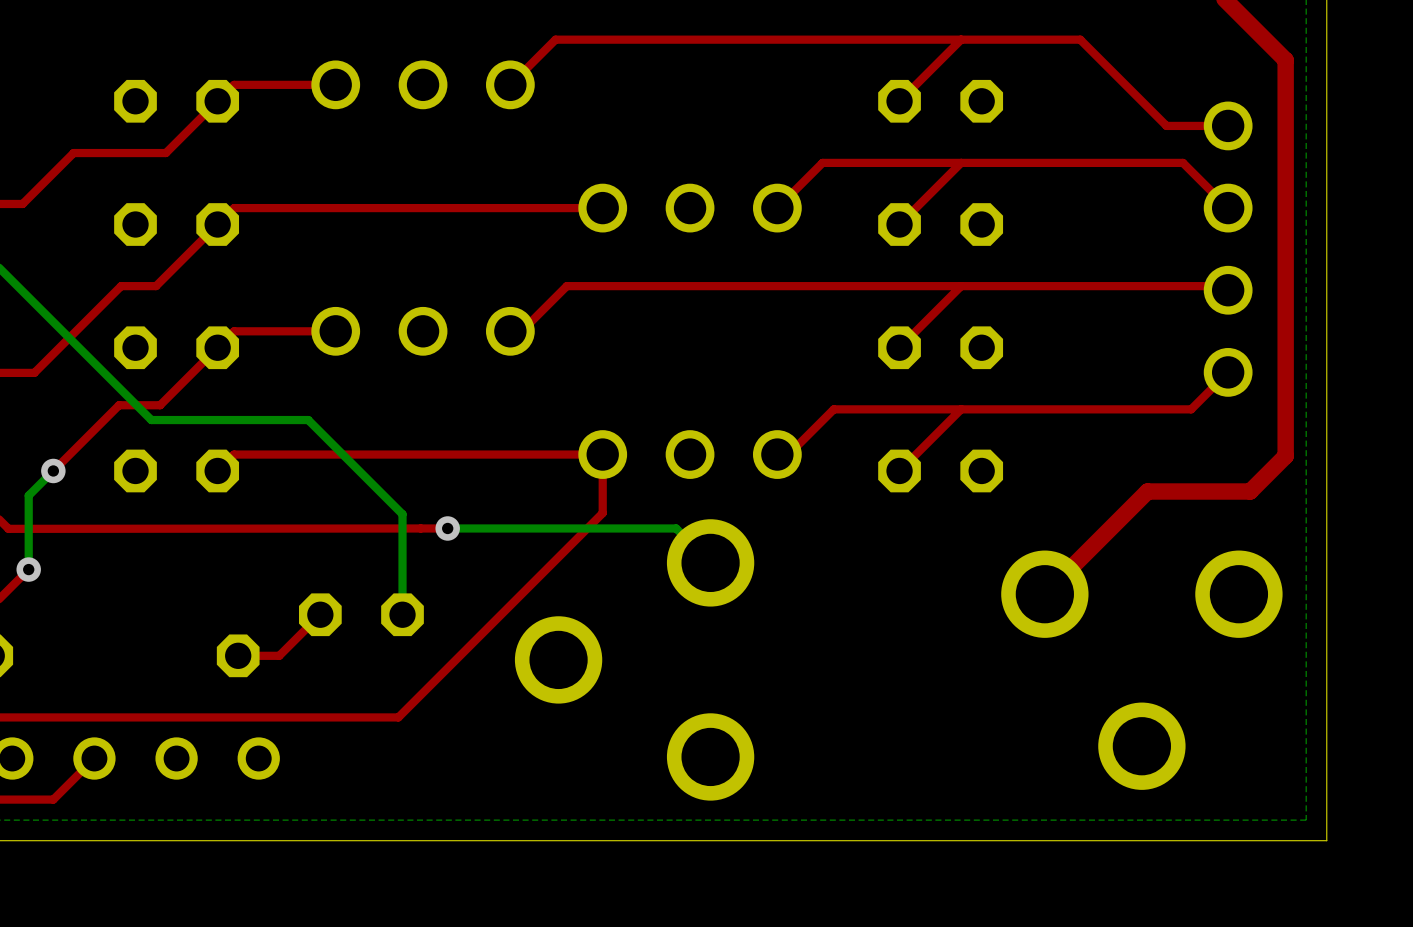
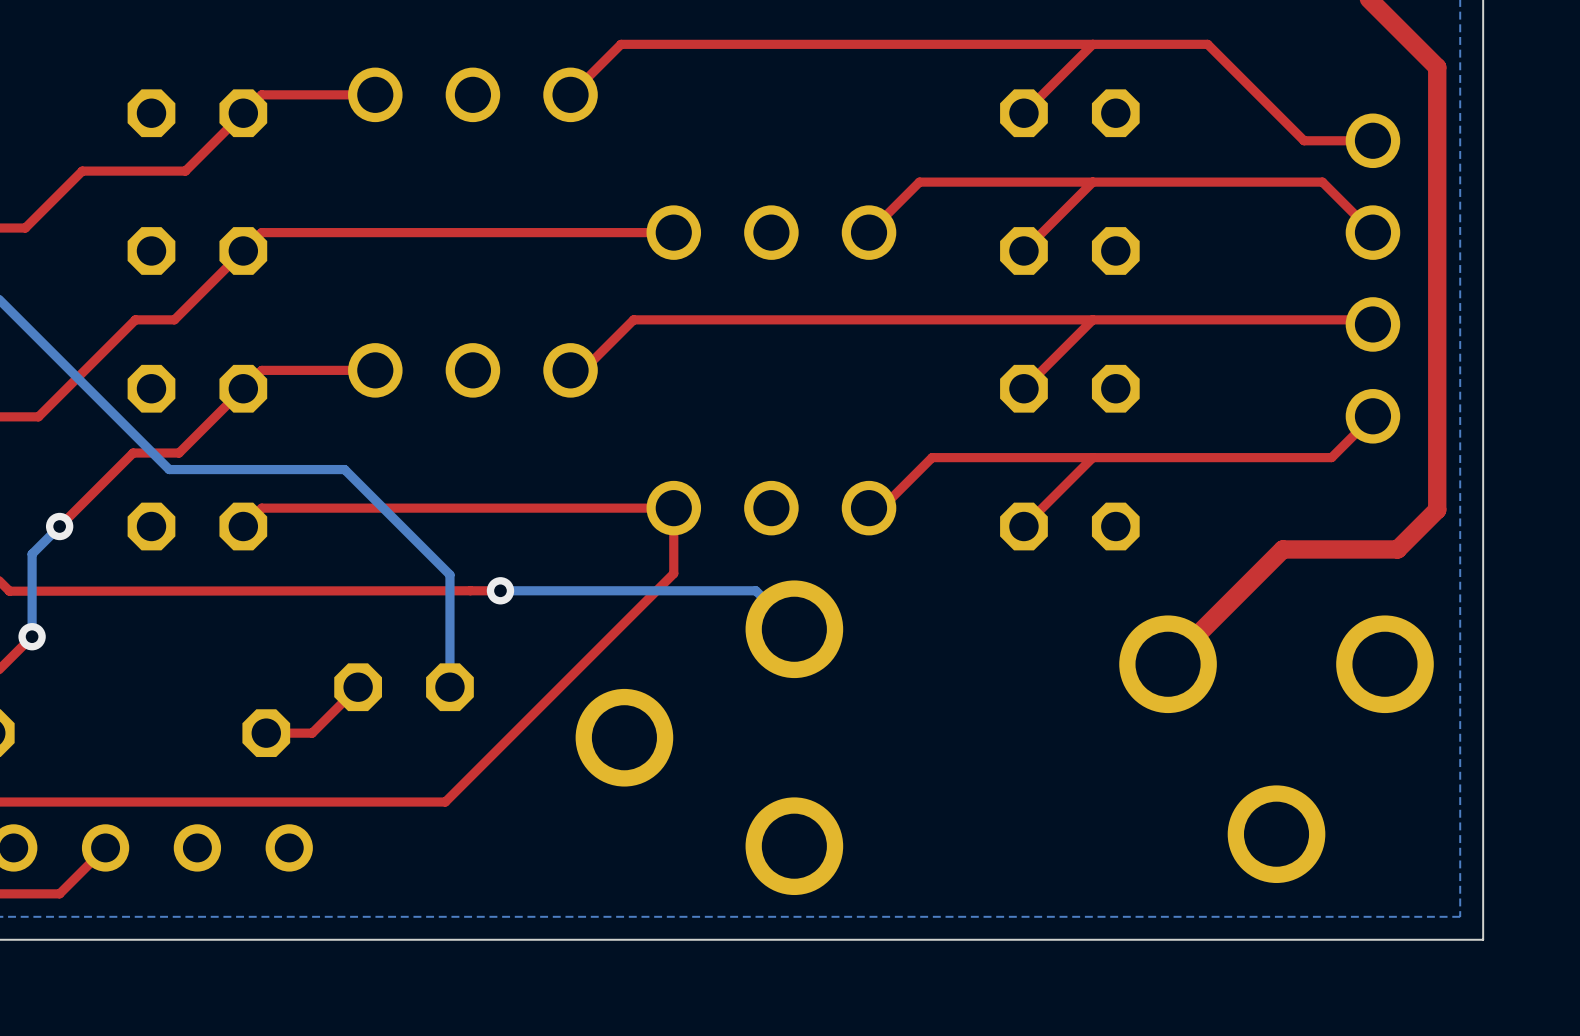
top track: (961, 39) (899, 101) -> (1092, 44) (1023, 113)
part position: (940, 101) -> (1069, 113)
top track: (961, 162) (899, 224) -> (1092, 182) (1023, 250)
part position: (940, 224) -> (1069, 250)
top track: (961, 286) (899, 347) -> (1092, 319) (1023, 388)
part position: (940, 347) -> (1069, 388)
top track: (961, 409) (899, 470) -> (1092, 457) (1023, 526)
part position: (940, 470) -> (1069, 526)

